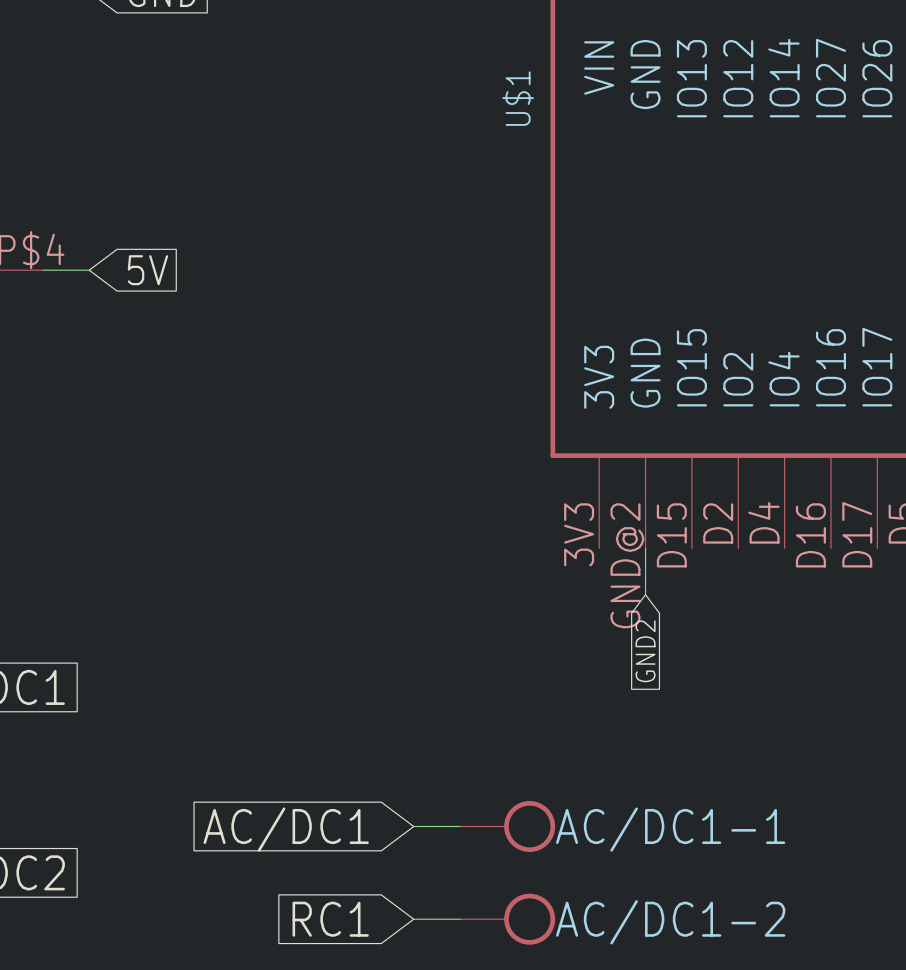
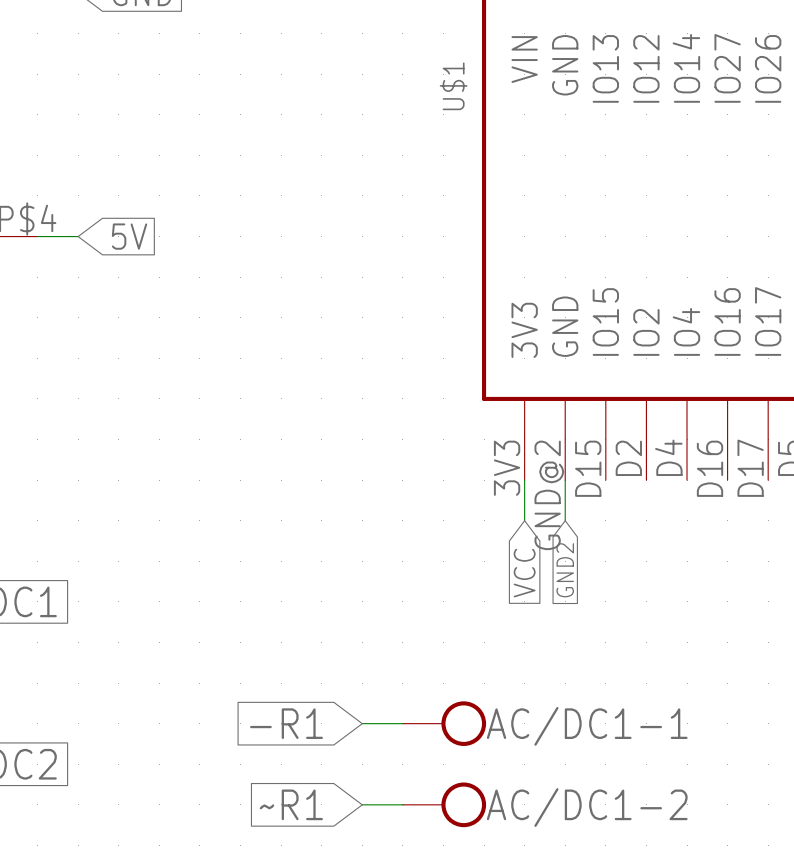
wire: none -> (524, 480) (524, 520)
global label: none -> VCC (524, 573)
global label: AC/DC1 (286, 829) -> -R1 (286, 723)
global label: RC1 (330, 919) -> ~R1 (291, 804)

